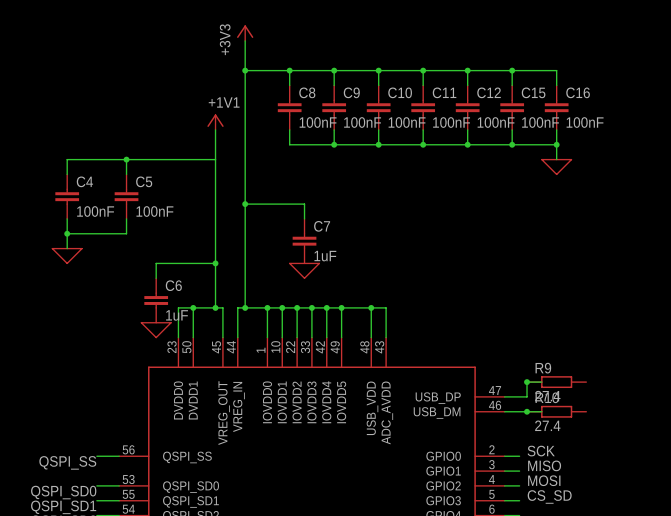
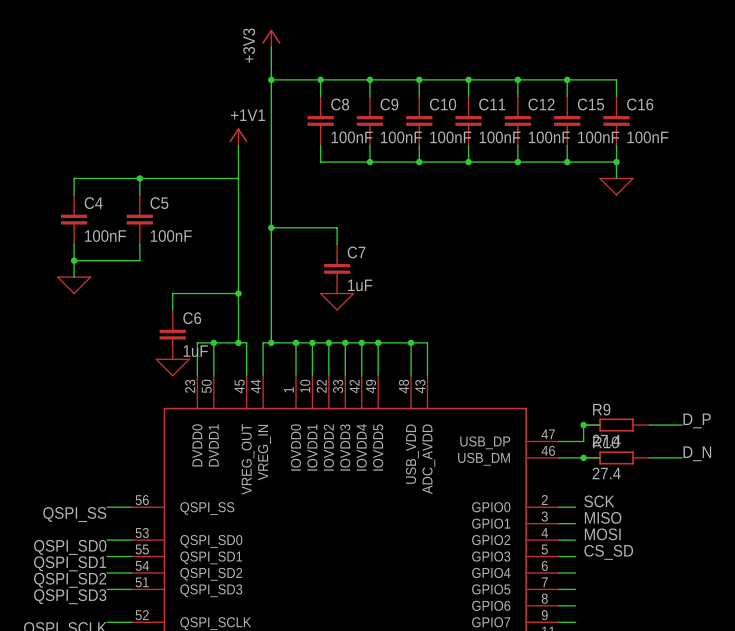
label: none -> D_P (697, 420)
wire: none -> (649, 425) (682, 425)
label: none -> D_N (697, 453)
wire: none -> (649, 457) (682, 457)

